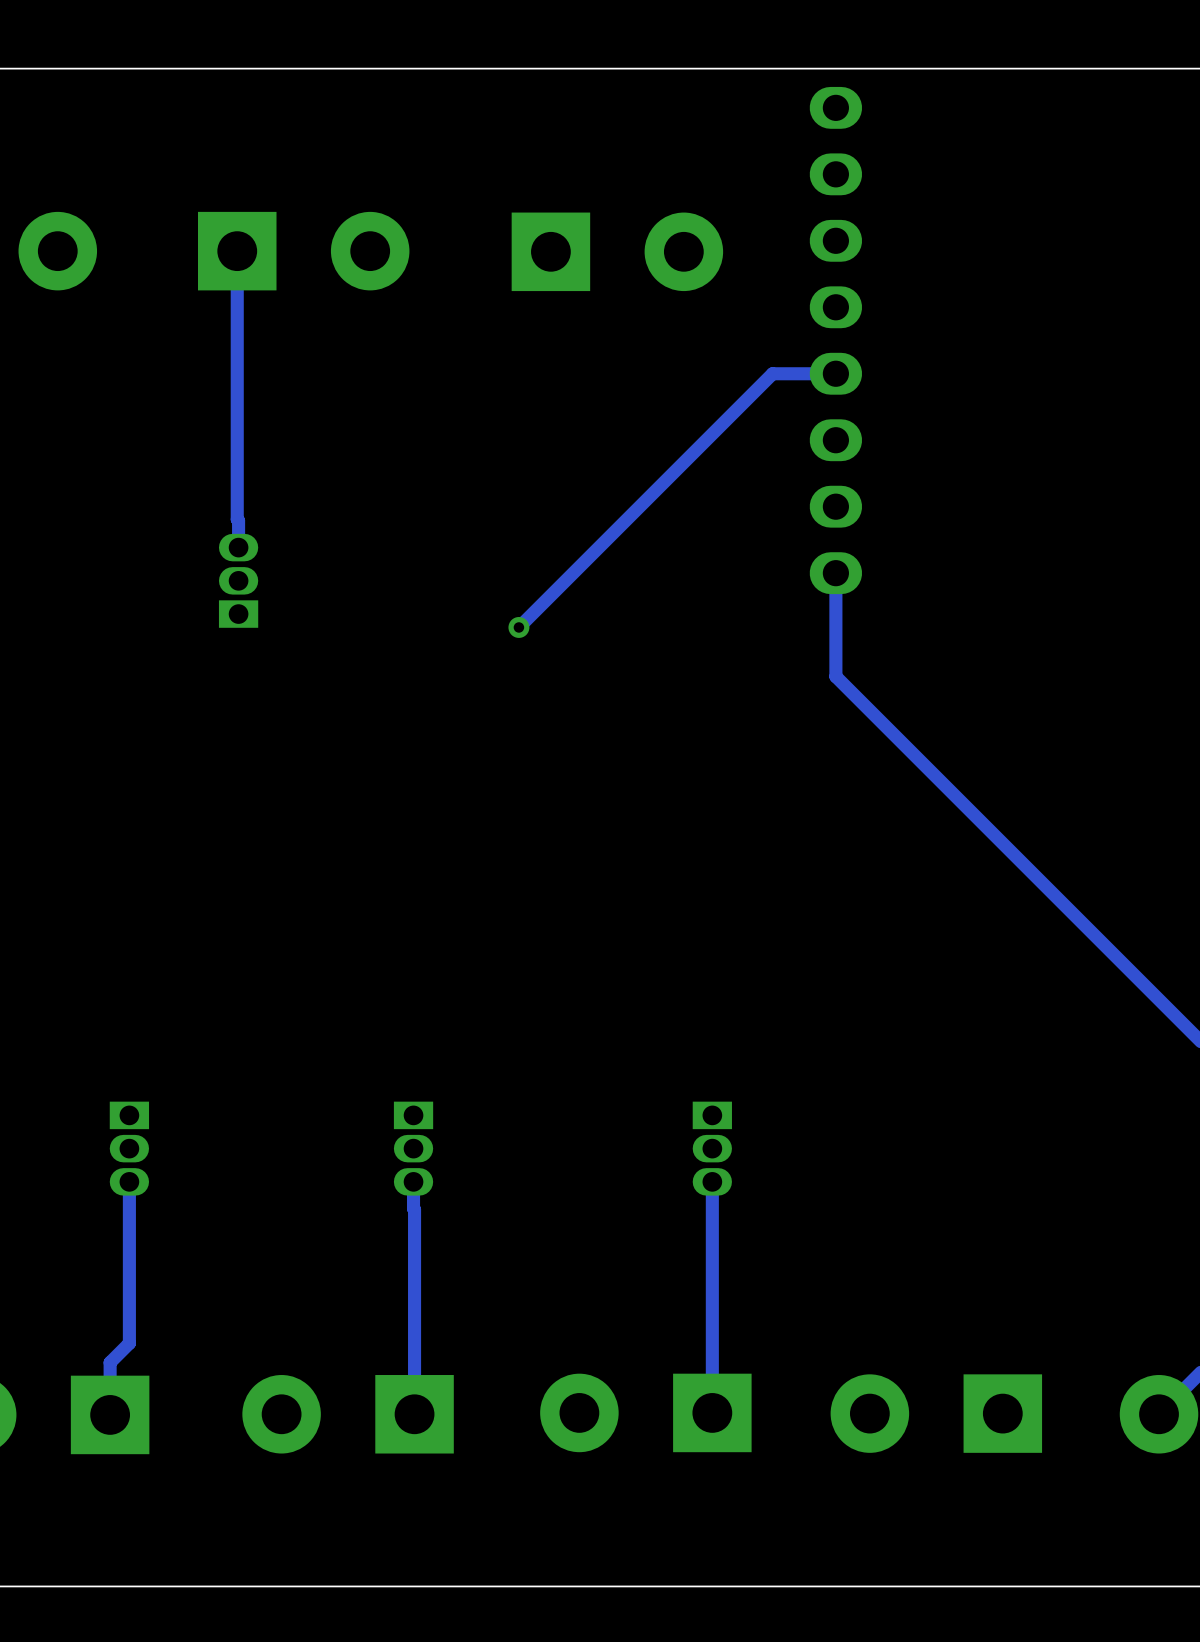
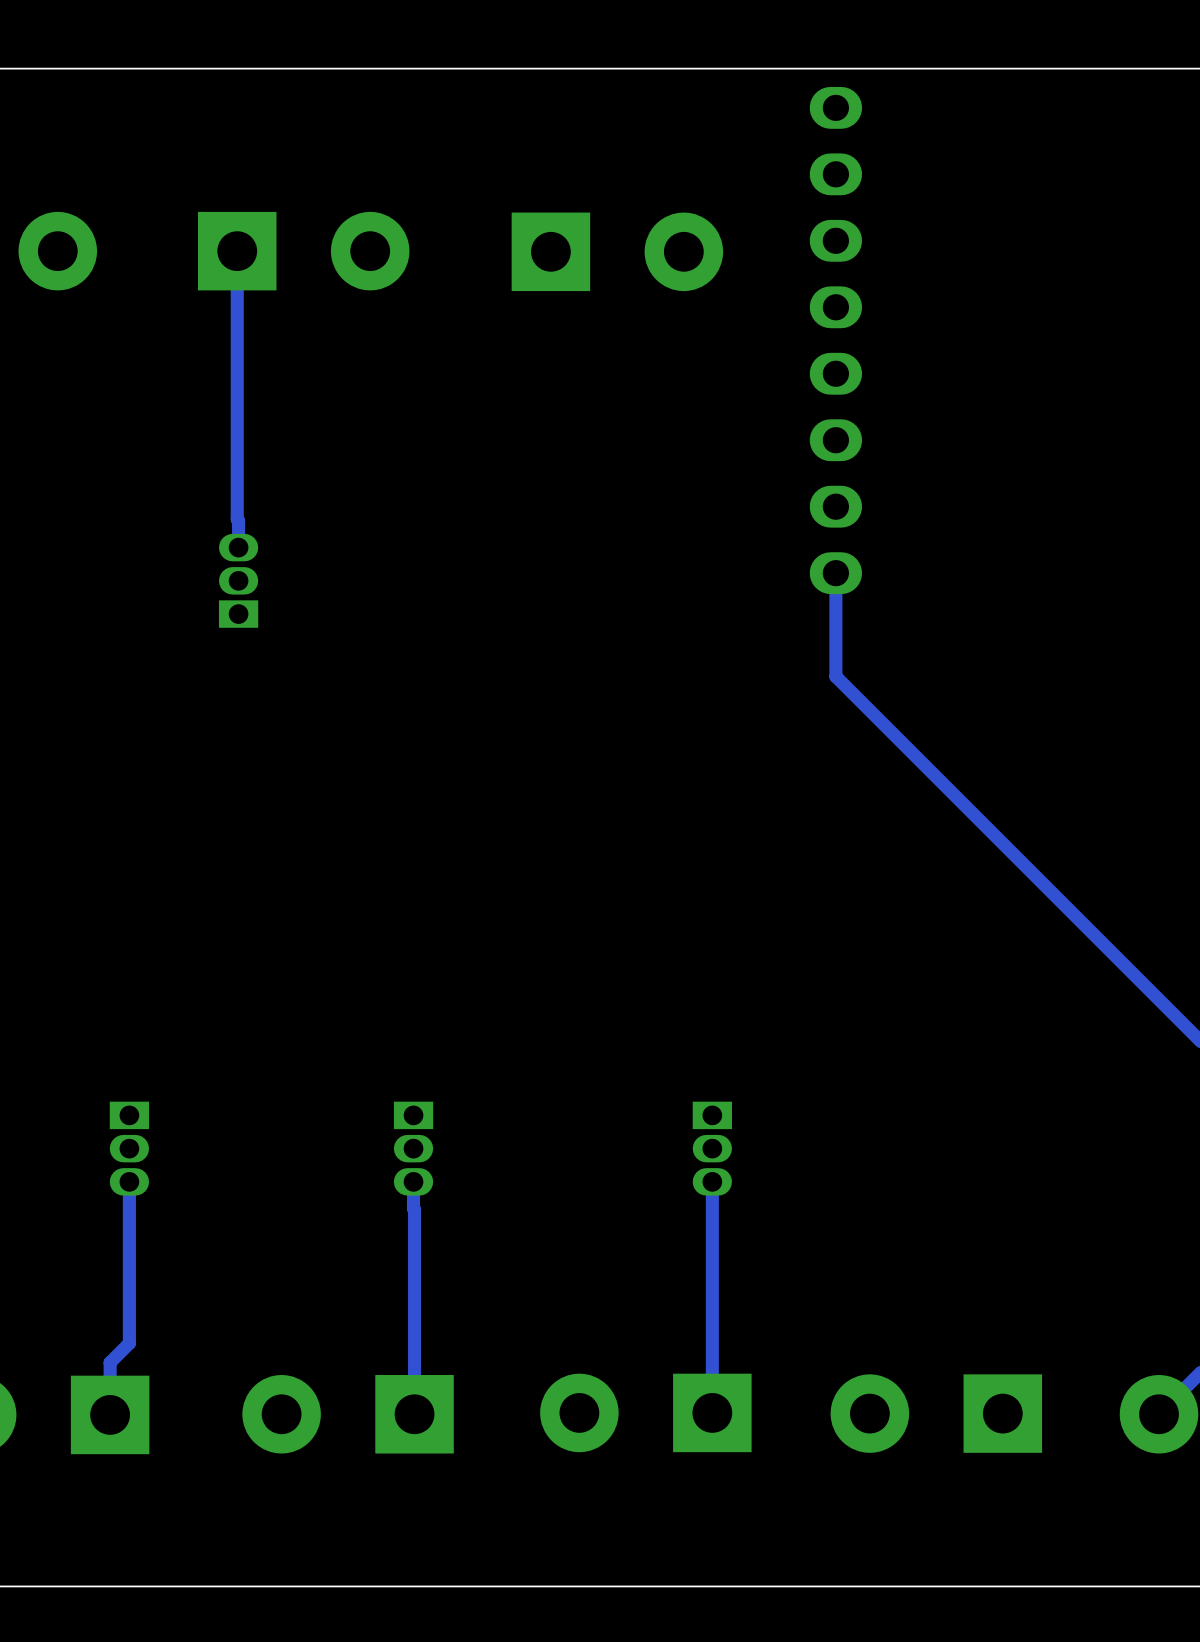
track: (835, 373) (772, 373) (518, 627) -> none
via: (518, 627) -> none

